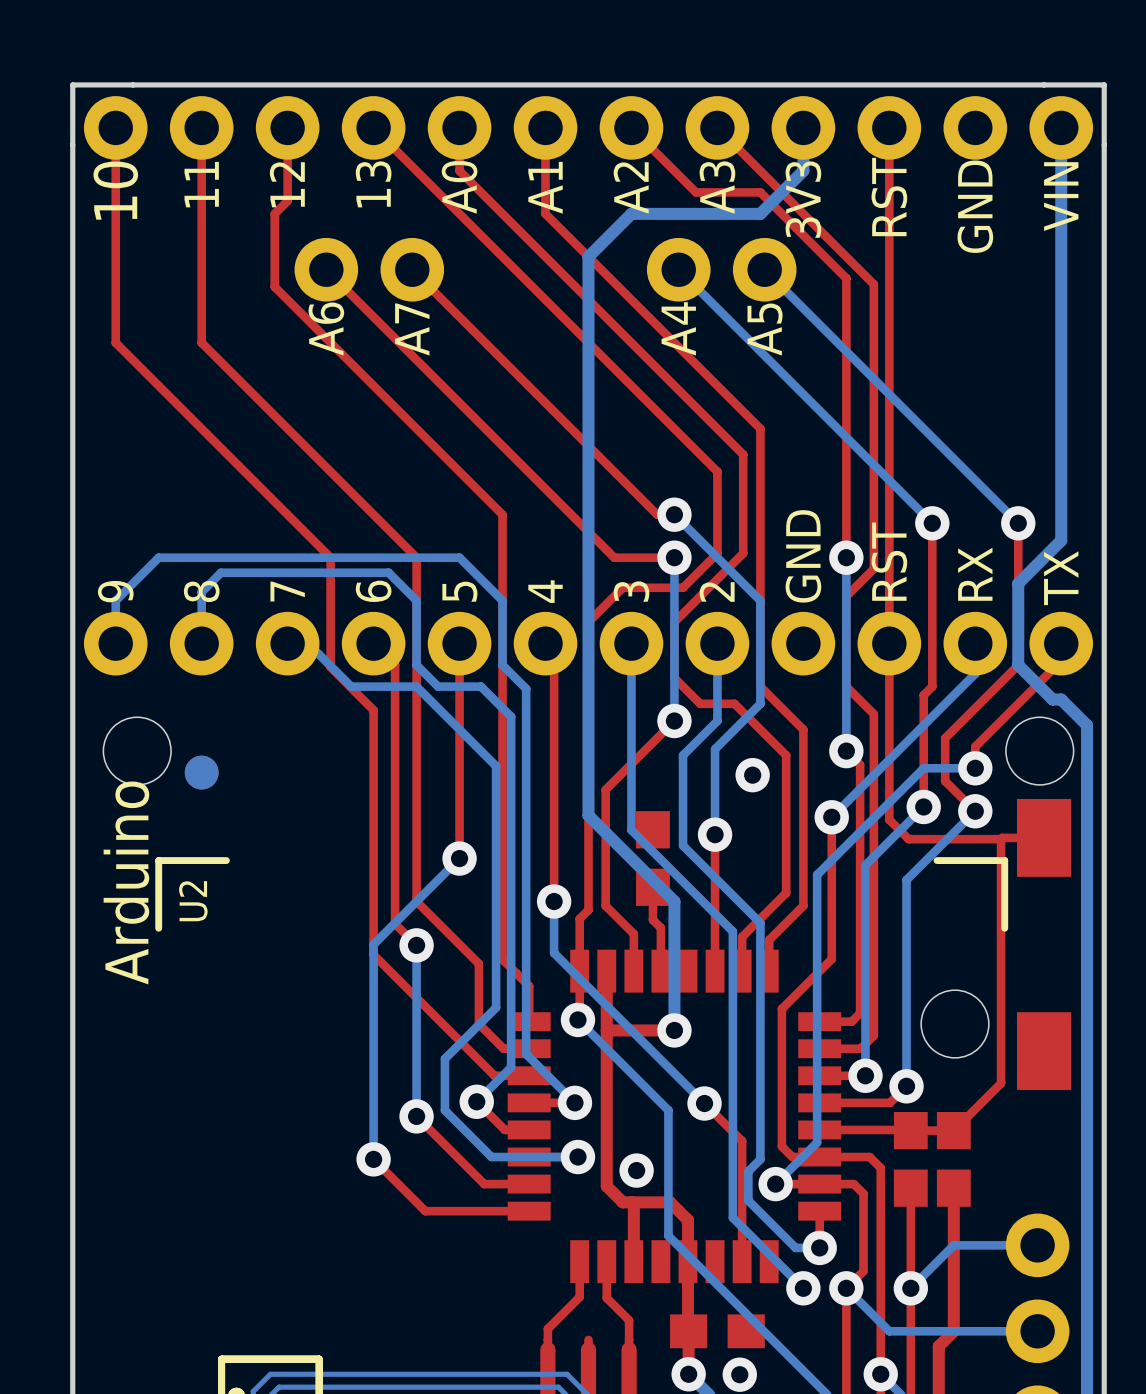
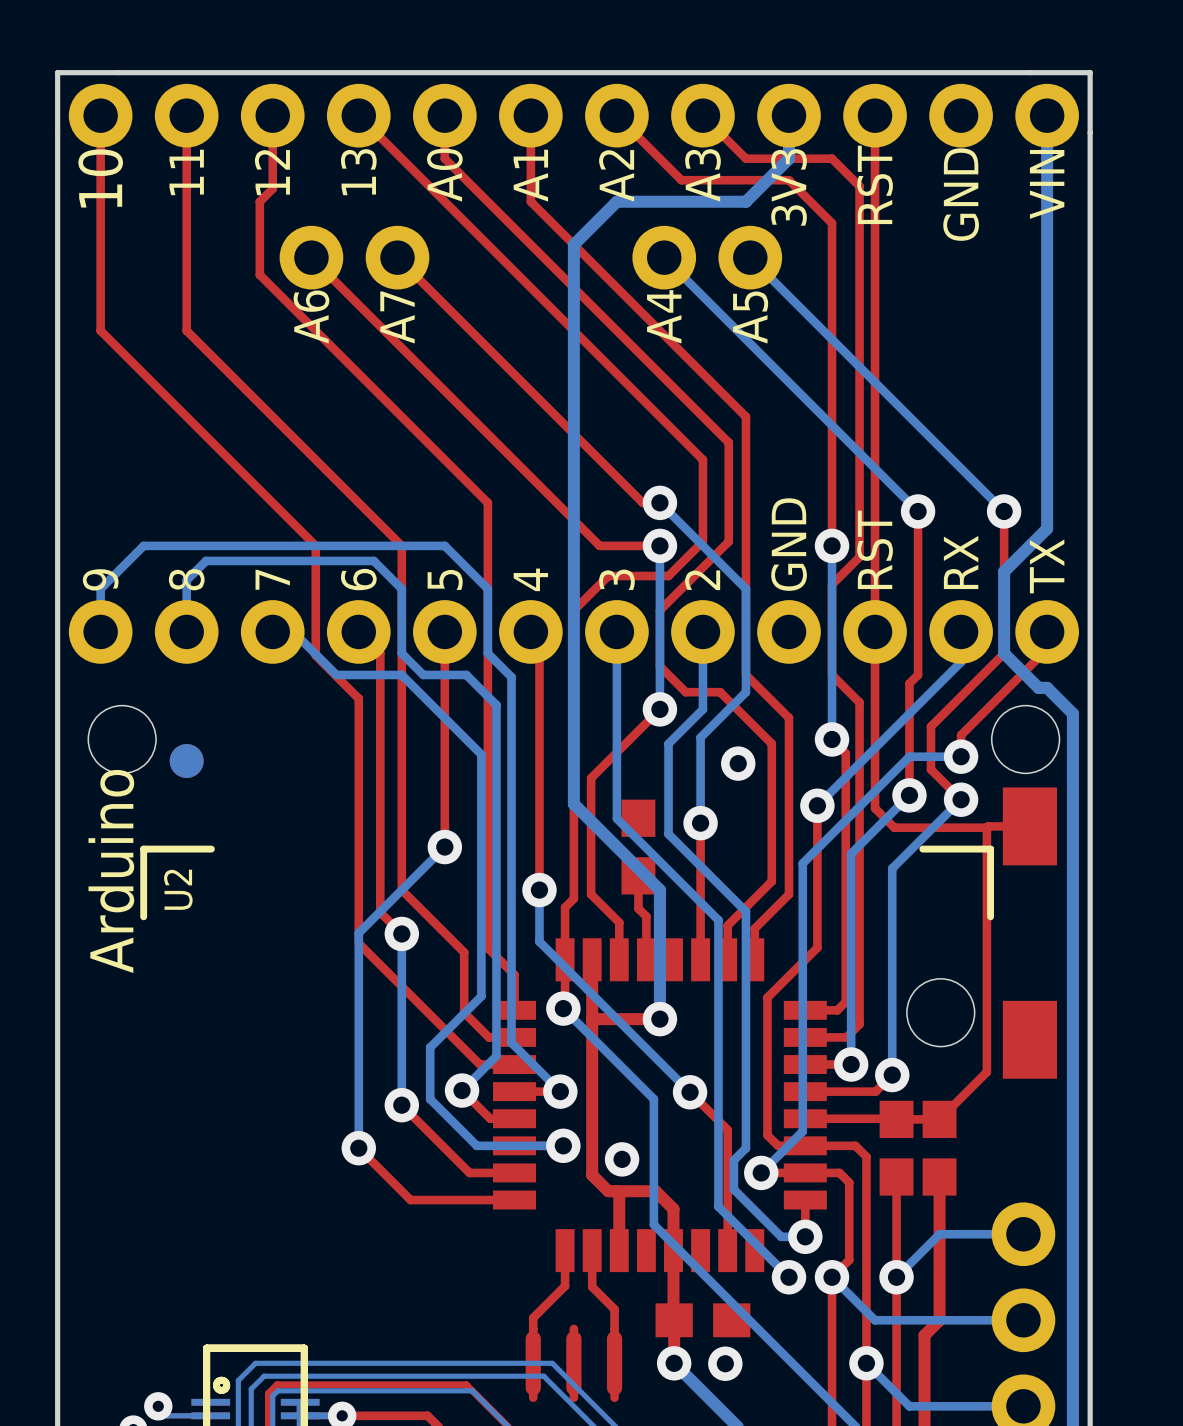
top track: (760, 170) (873, 284) -> (745, 158) (832, 158) (859, 186) (859, 272)
top track: (760, 192) (846, 278) -> (745, 180) (789, 180) (832, 223) (832, 266)

